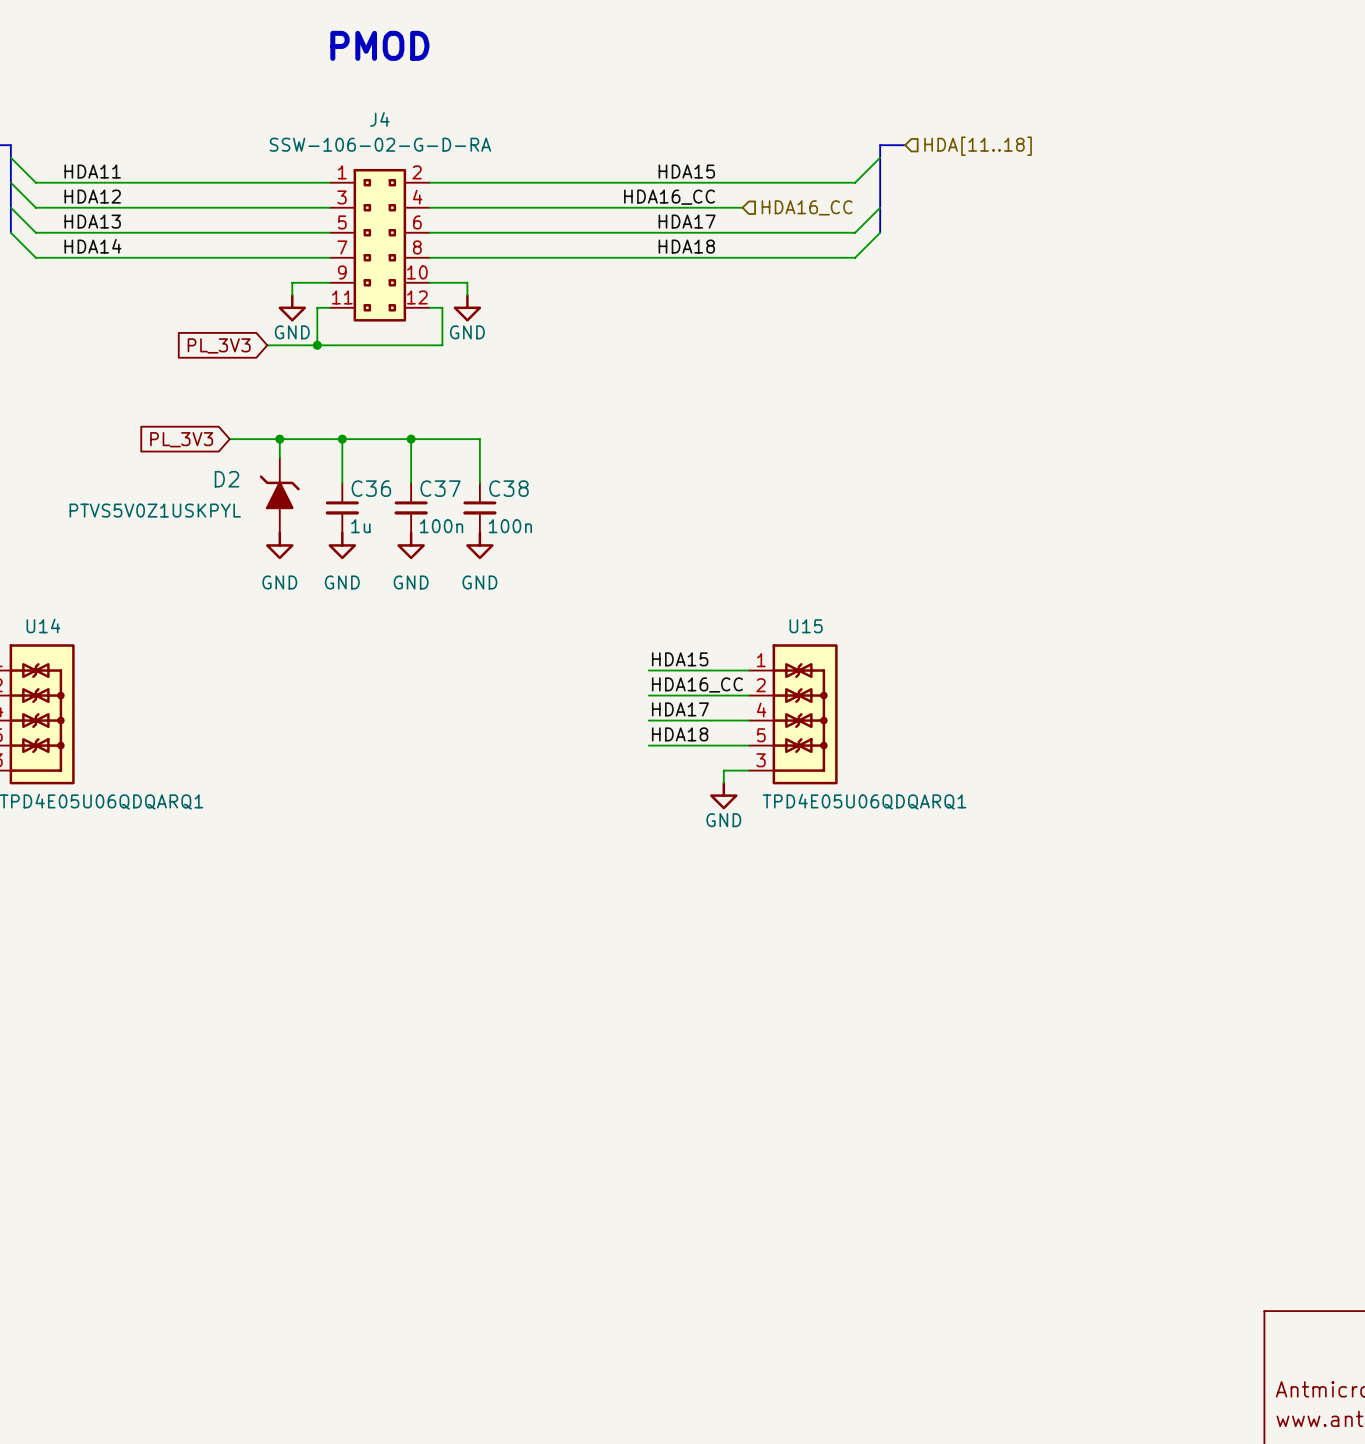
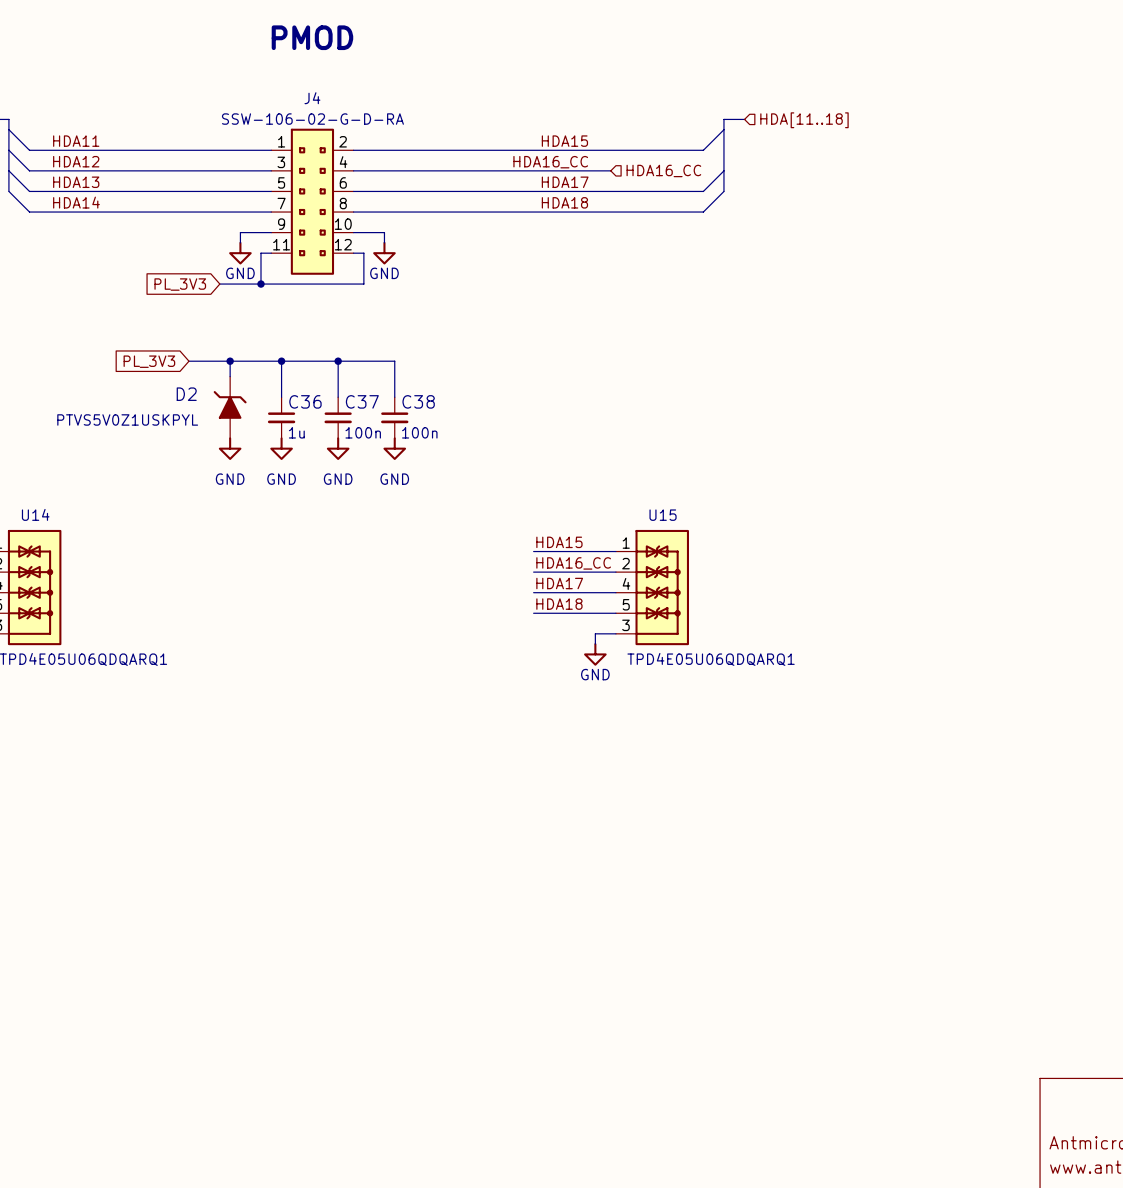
J4 symbol: [329, 168, 430, 322] -> [271, 128, 354, 275]

